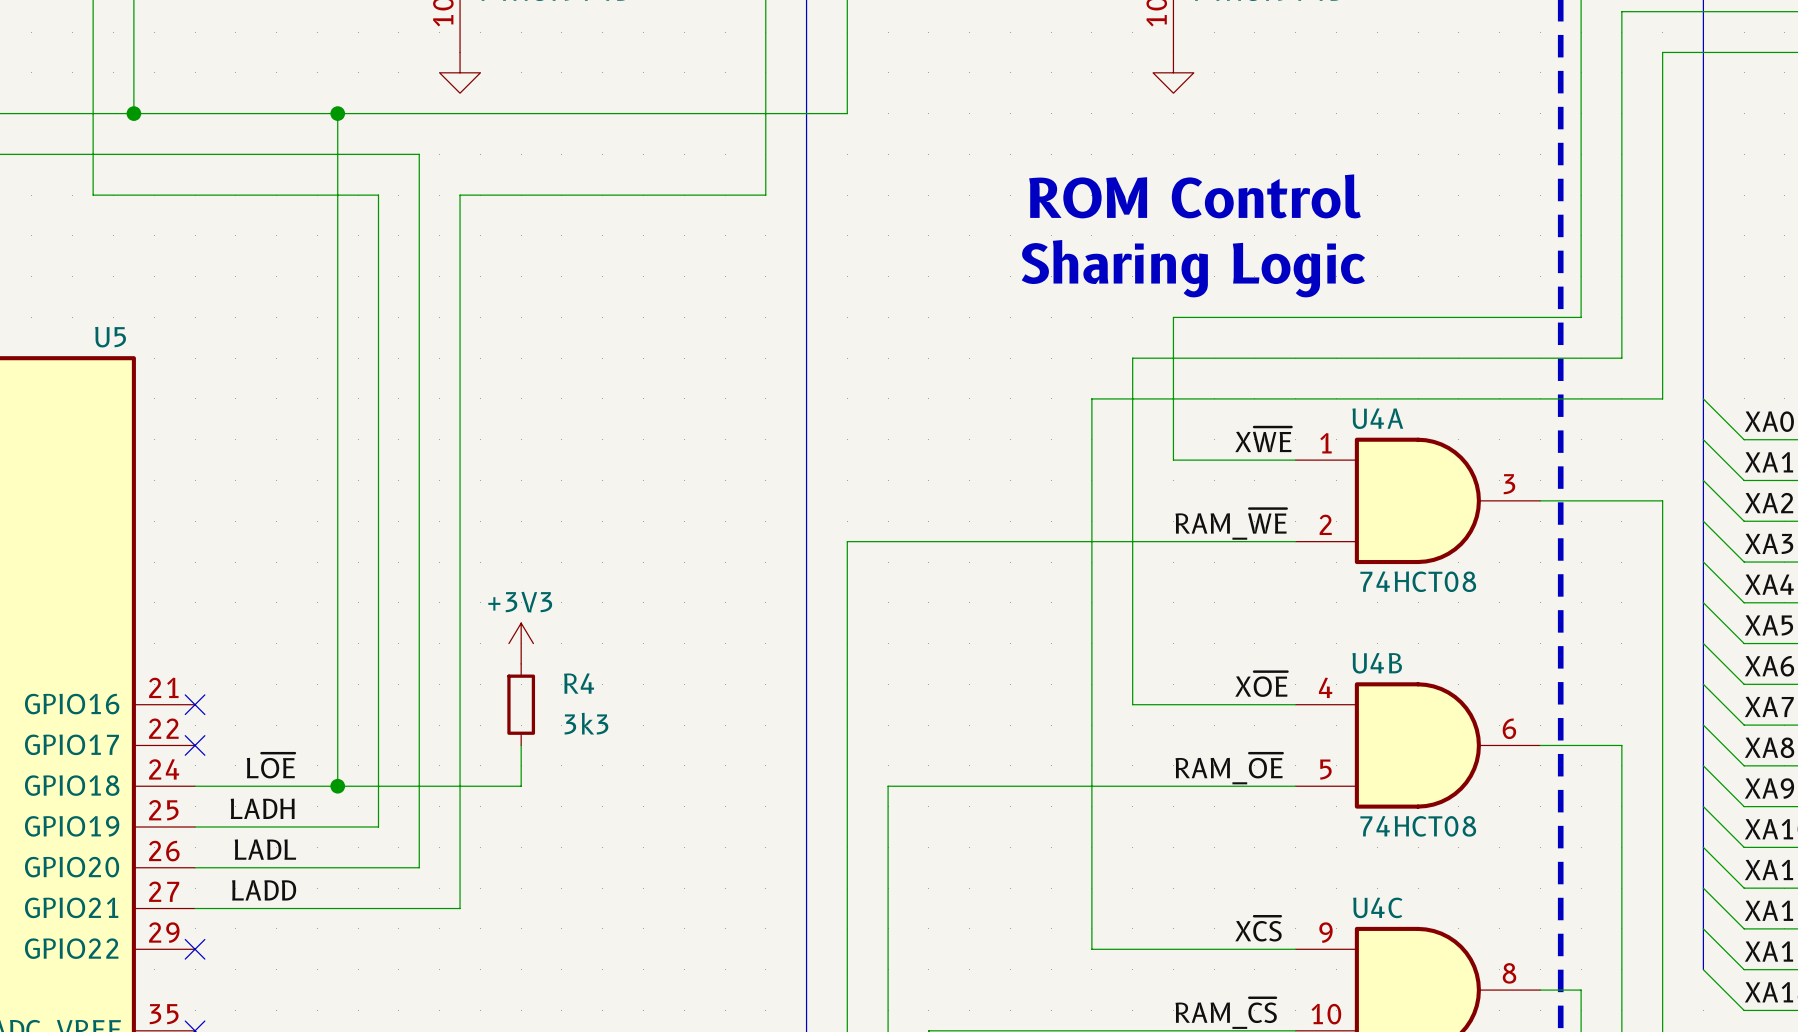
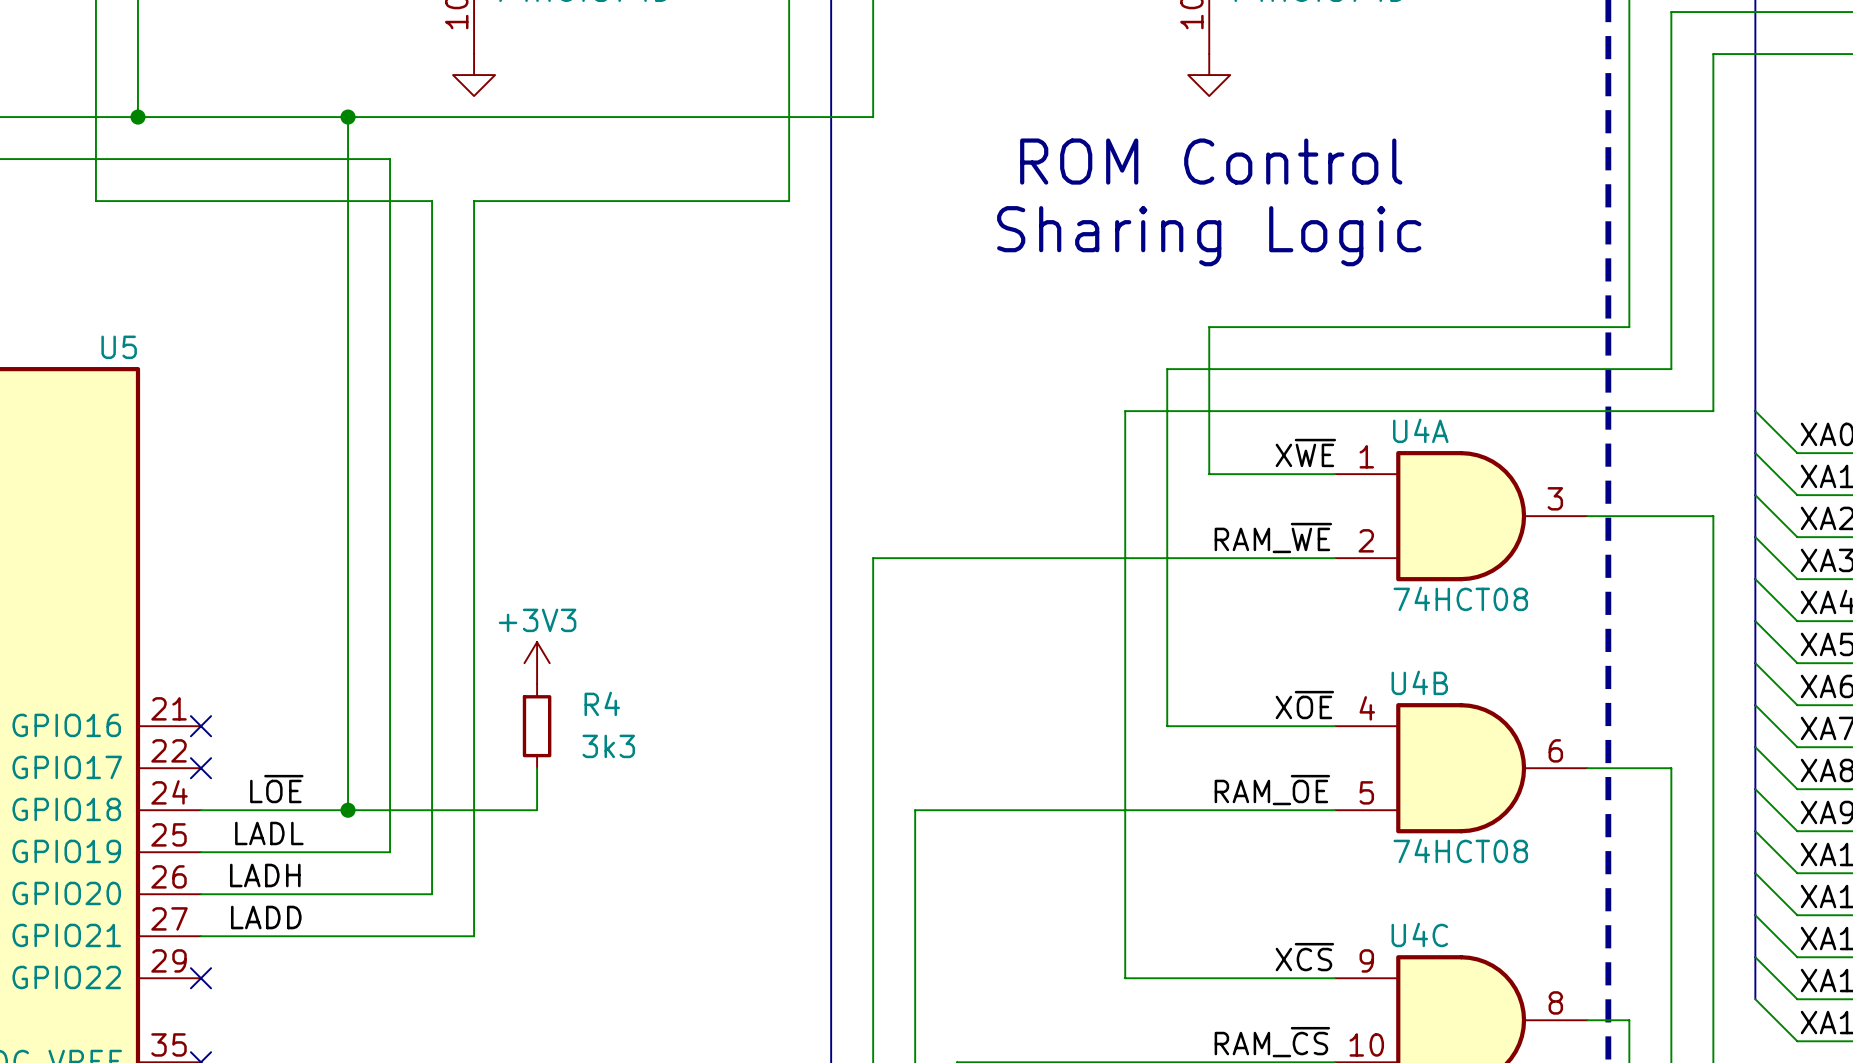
wire: (378, 154) (419, 154) (419, 195) -> (390, 159) (390, 201) (432, 201)
text position: ROM Control (1194, 196) -> ROM Control (1211, 161)
text position: Sharing Logic (1193, 268) -> Sharing Logic (1209, 236)
label: LADH (262, 808) -> LADL (269, 833)
label: LADL (265, 849) -> LADH (265, 875)

